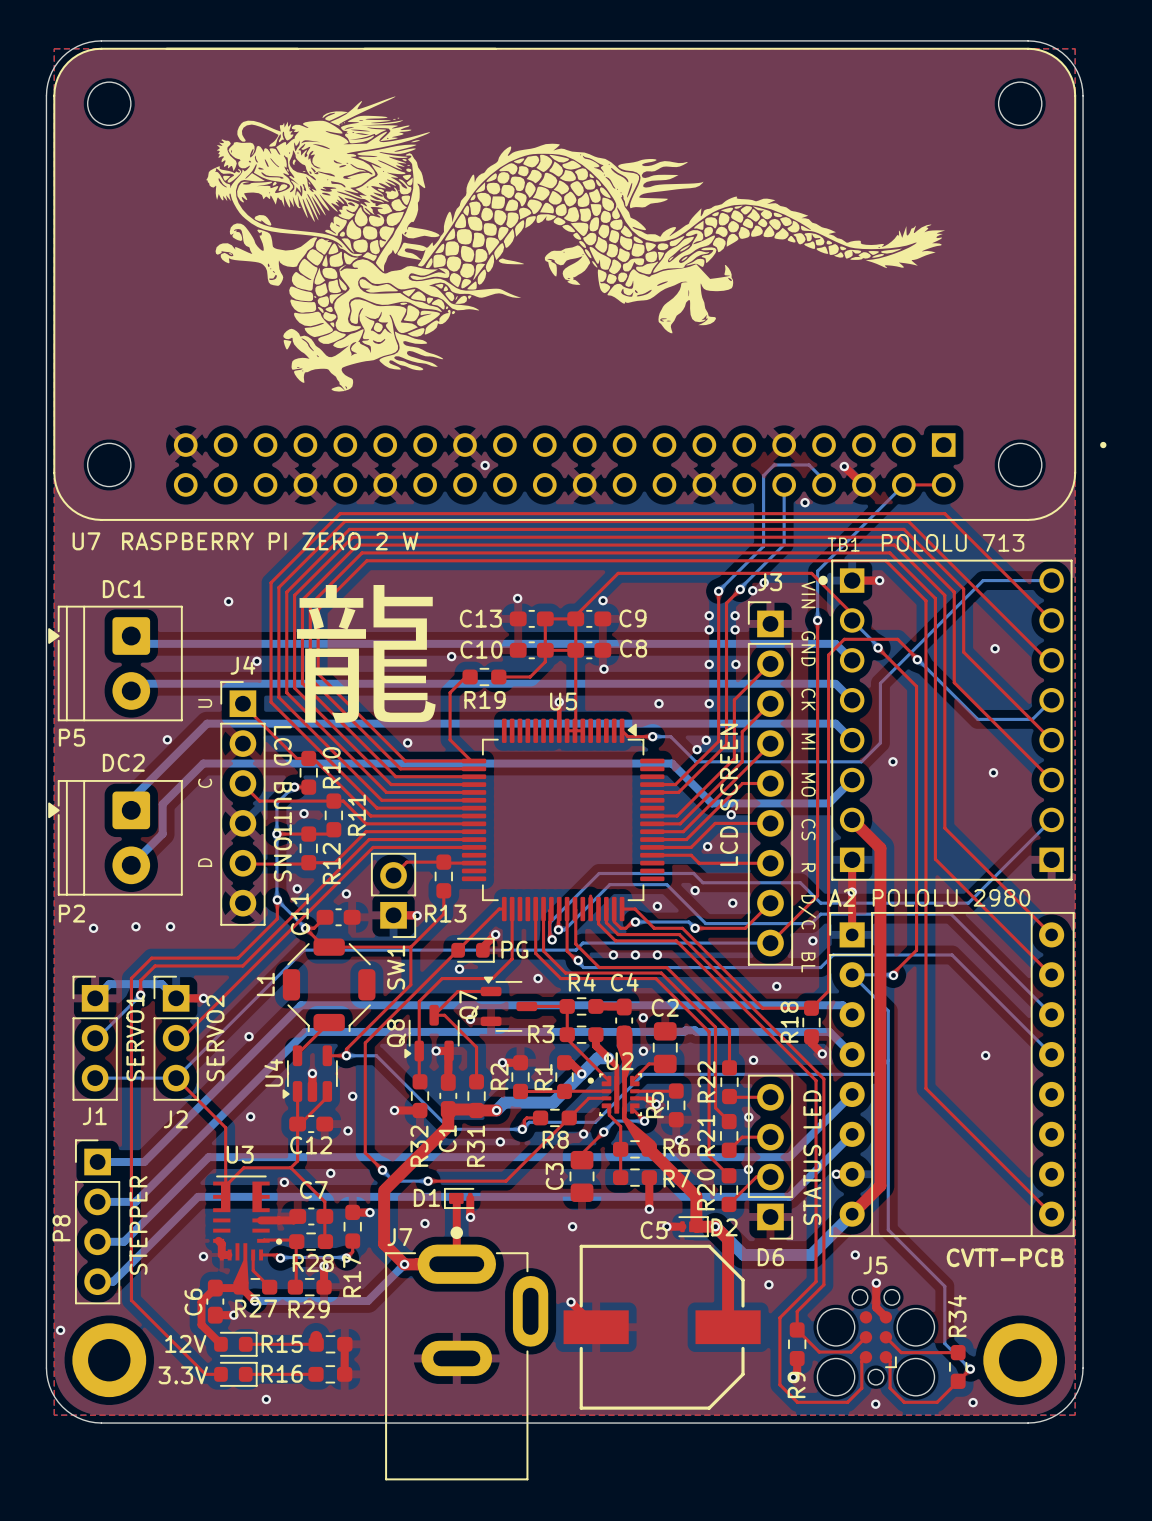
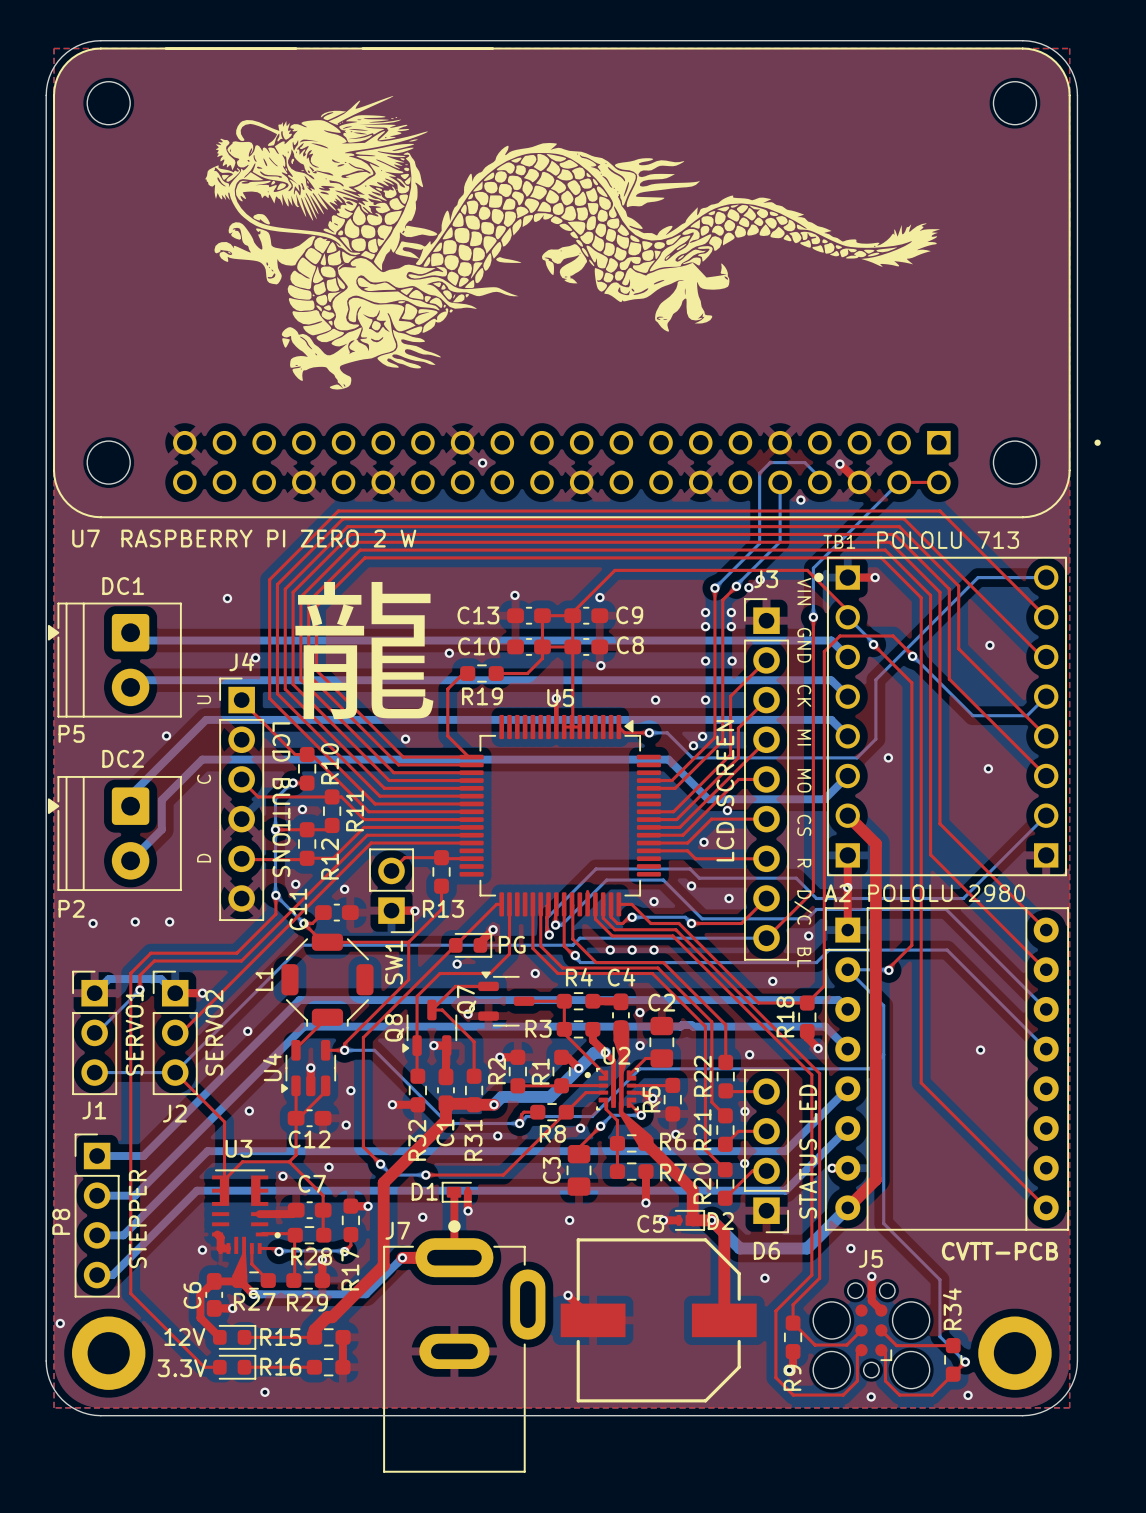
top track: (385, 1189) (384, 1190) (384, 1243) (404, 1264) -> (383, 1182) (383, 1265) (332, 1317) (327, 1317) (314, 1329)

